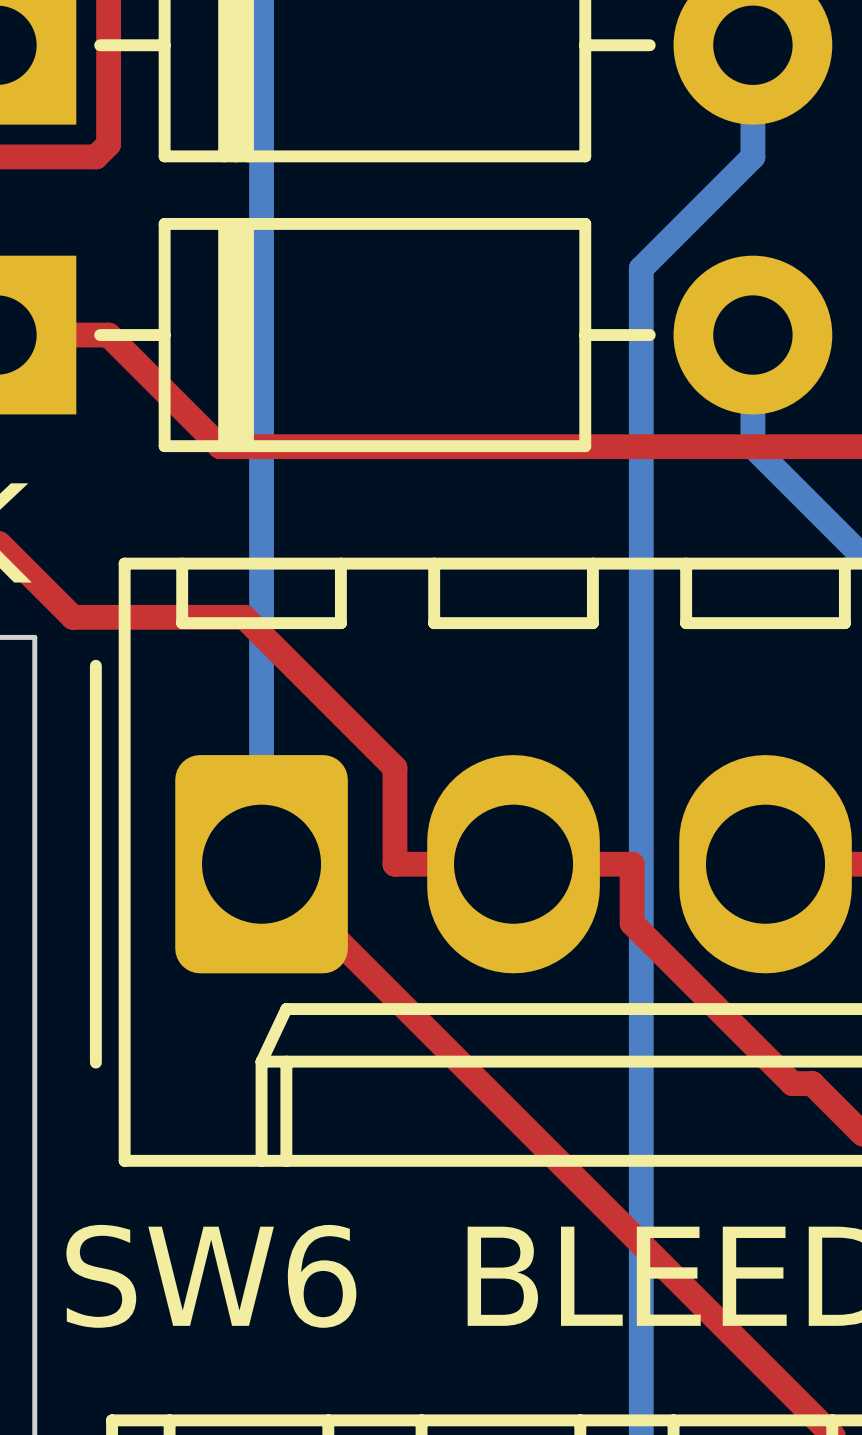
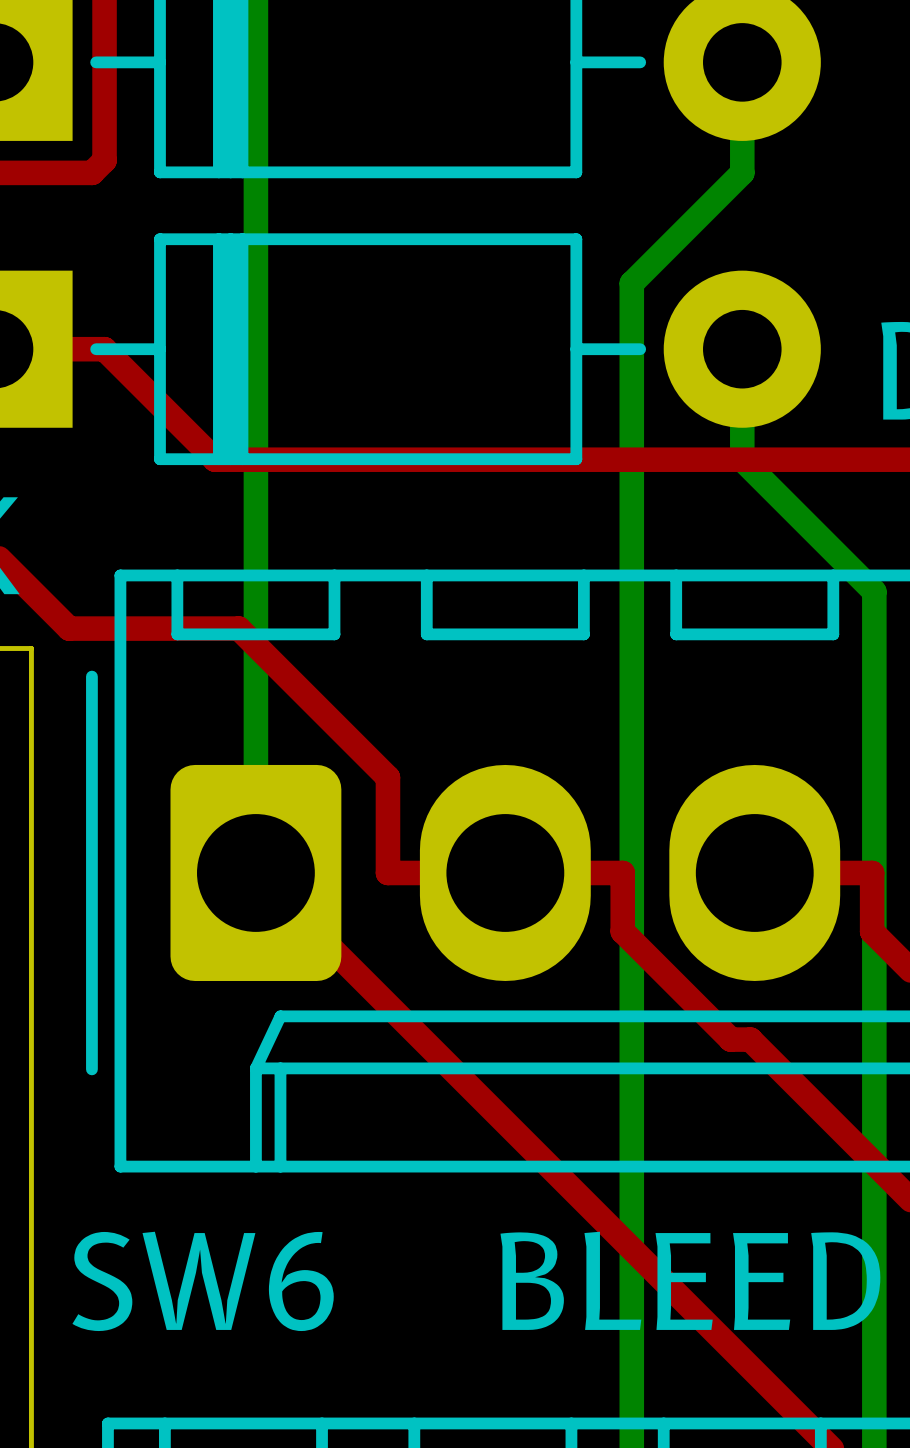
top track: (741, 1032) (792, 1083) (812, 1083) -> (730, 1039) (750, 1039) (801, 1090)

